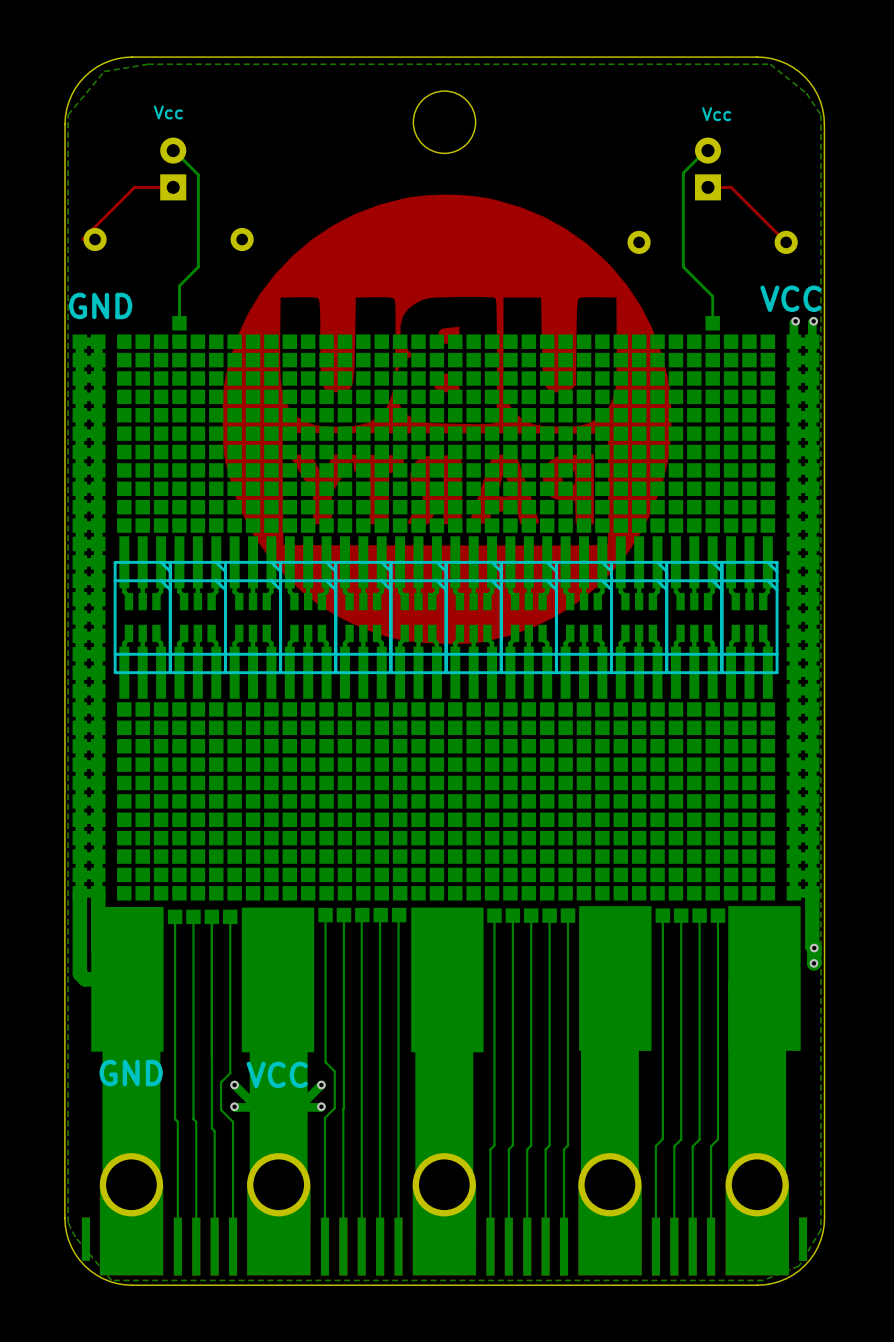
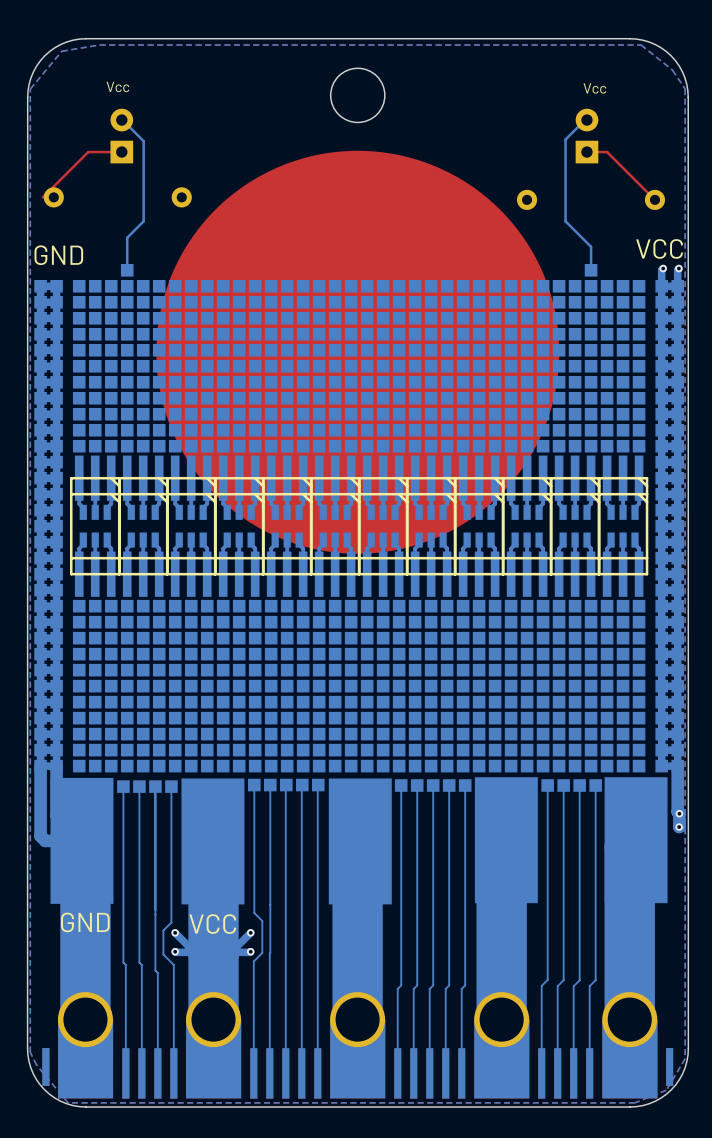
drawing: [222, 194, 672, 644] -> none
part: none -> (357, 352)

